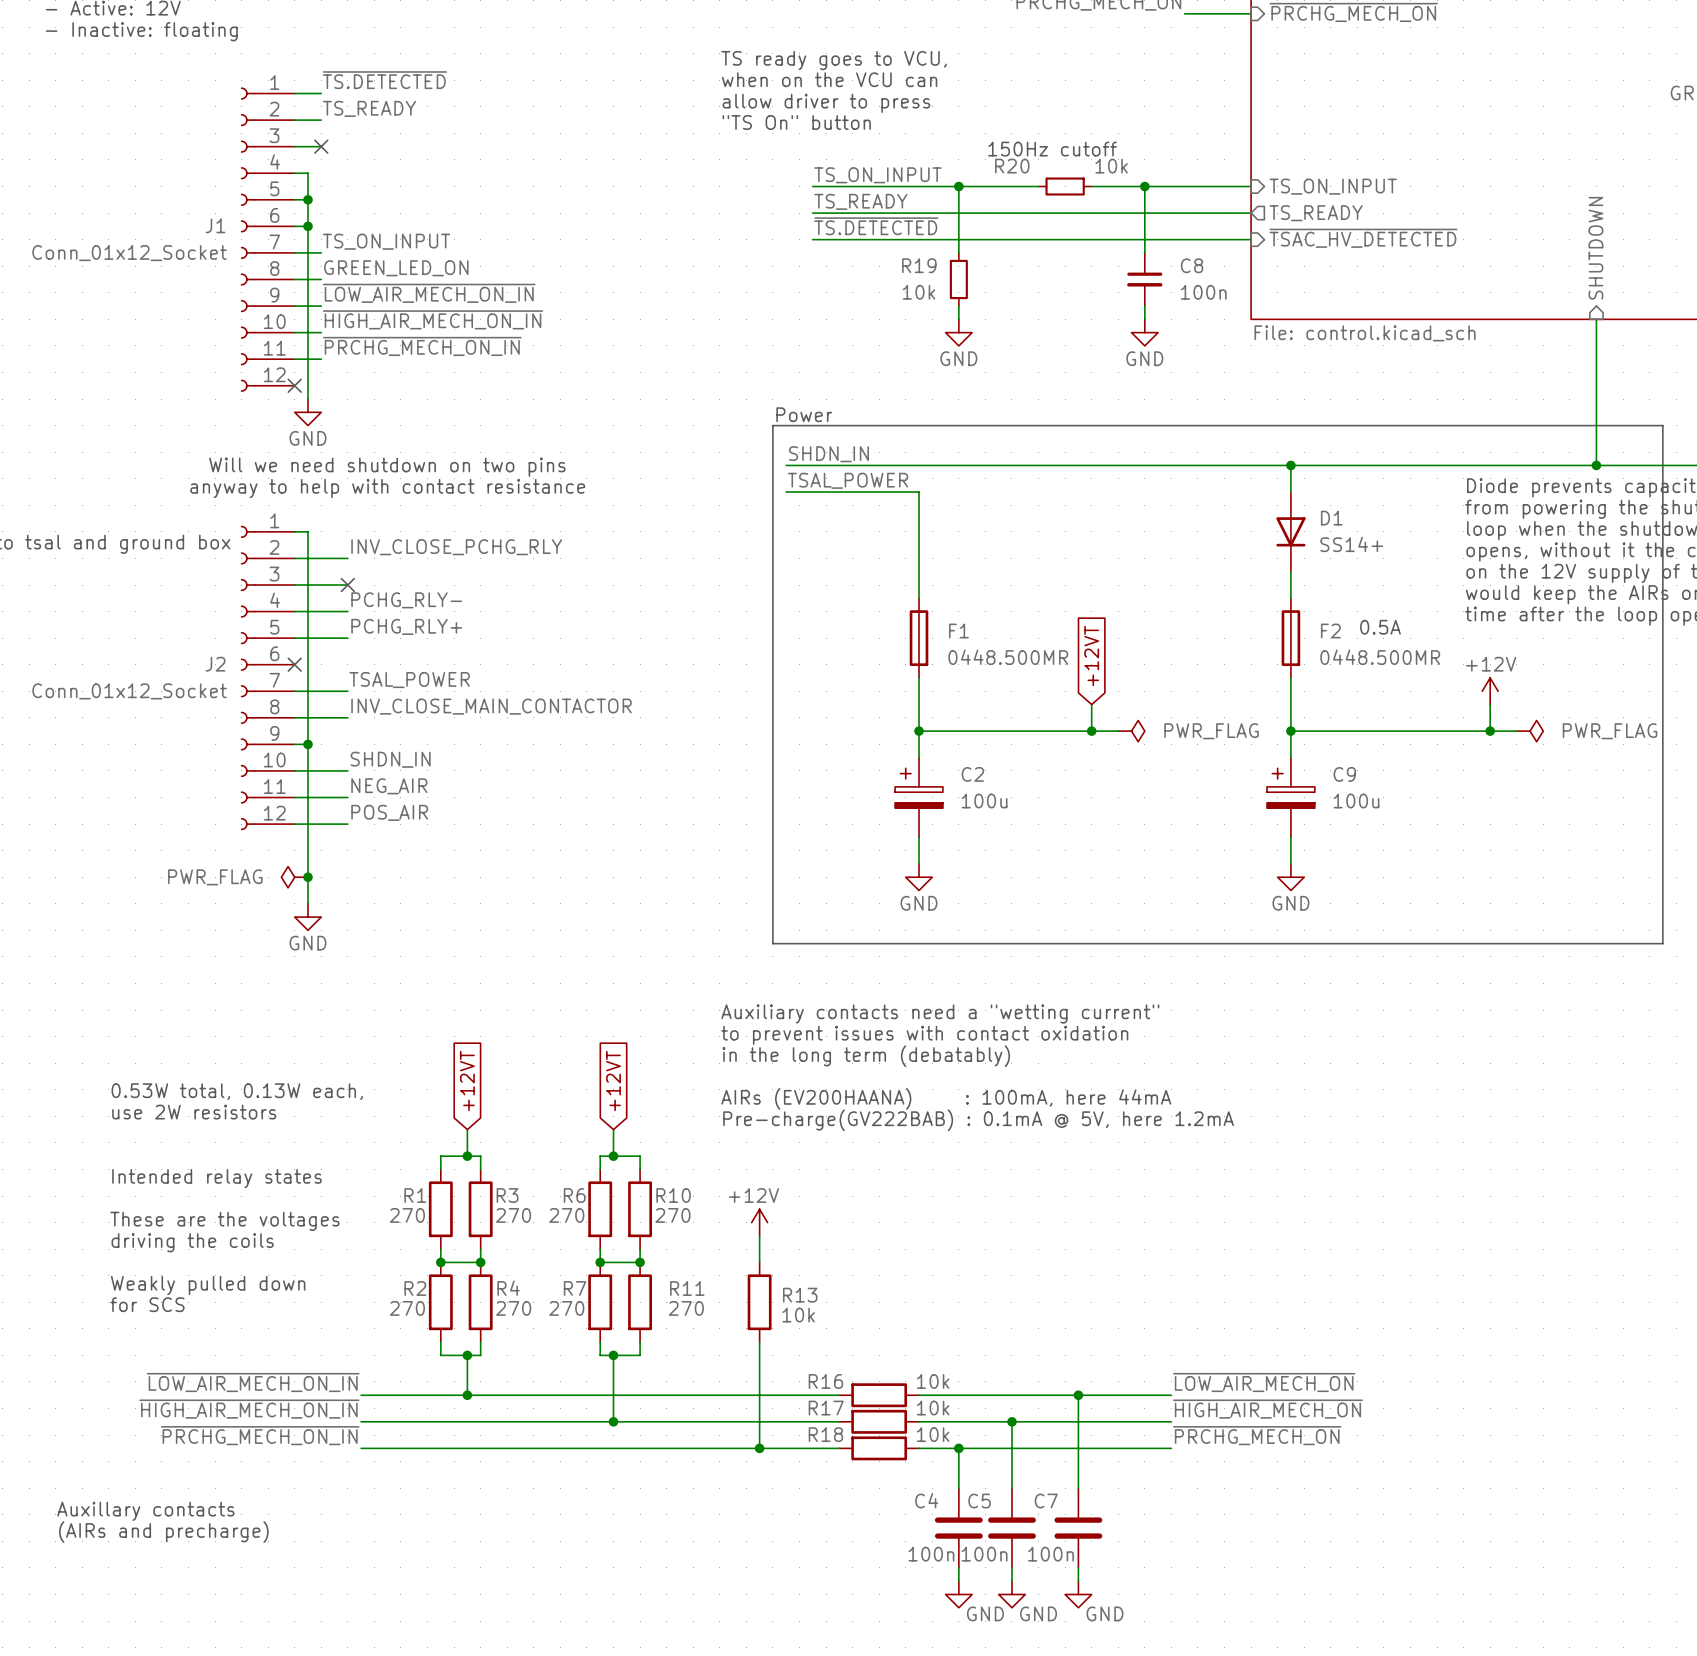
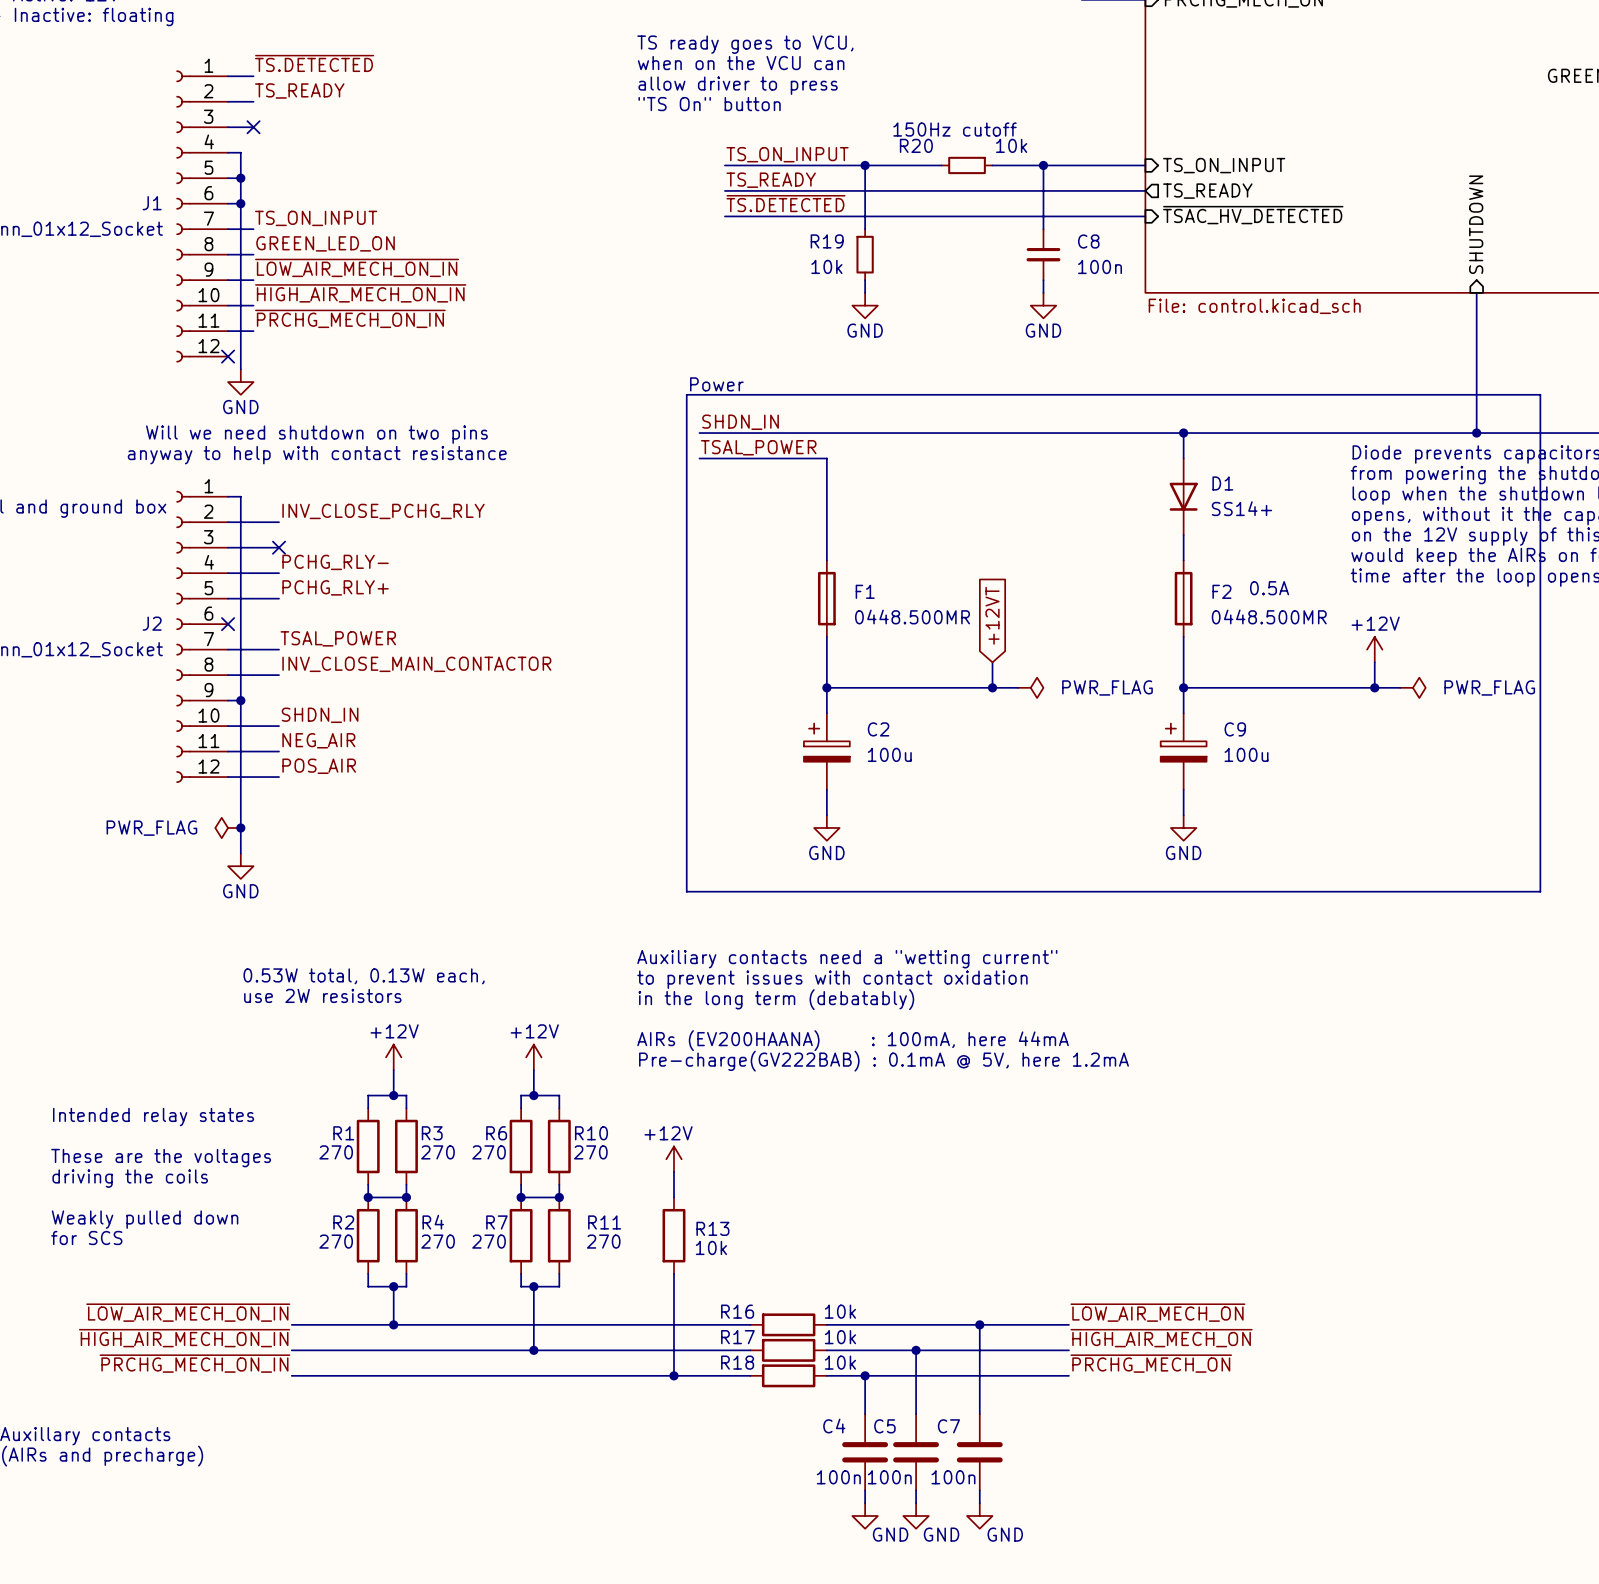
global label: +12VT (467, 1081) -> none
global label: +12VT (613, 1081) -> none
text position: 0.53W total, 0.13W each, (237, 1091) -> 0.53W total, 0.13W each, (364, 976)
text position: use 2W resistors (194, 1112) -> use 2W resistors (322, 995)
power symbol: none -> +12V (393, 1057)
power symbol: none -> +12V (533, 1057)

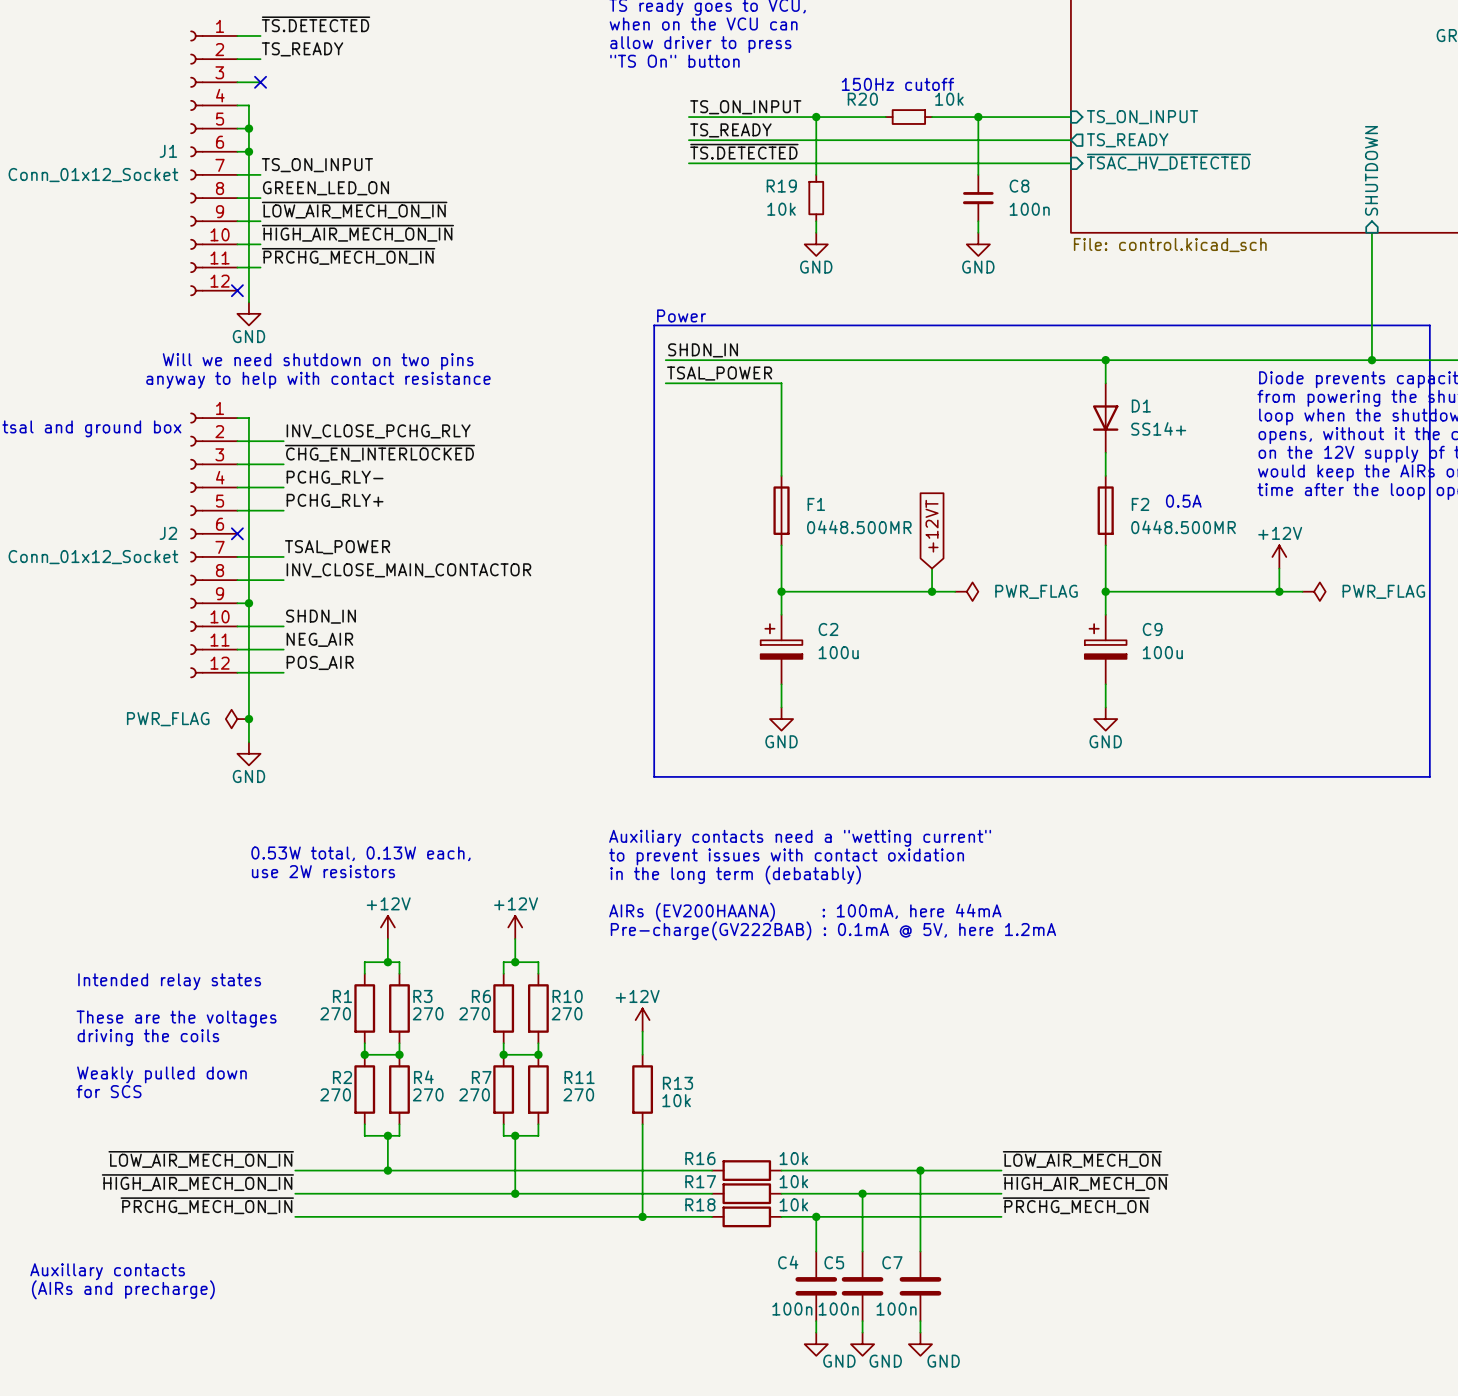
label: none -> ~{CHG_EN_INTERLOCKED} (379, 453)
no-connect mark: (279, 547) -> none

